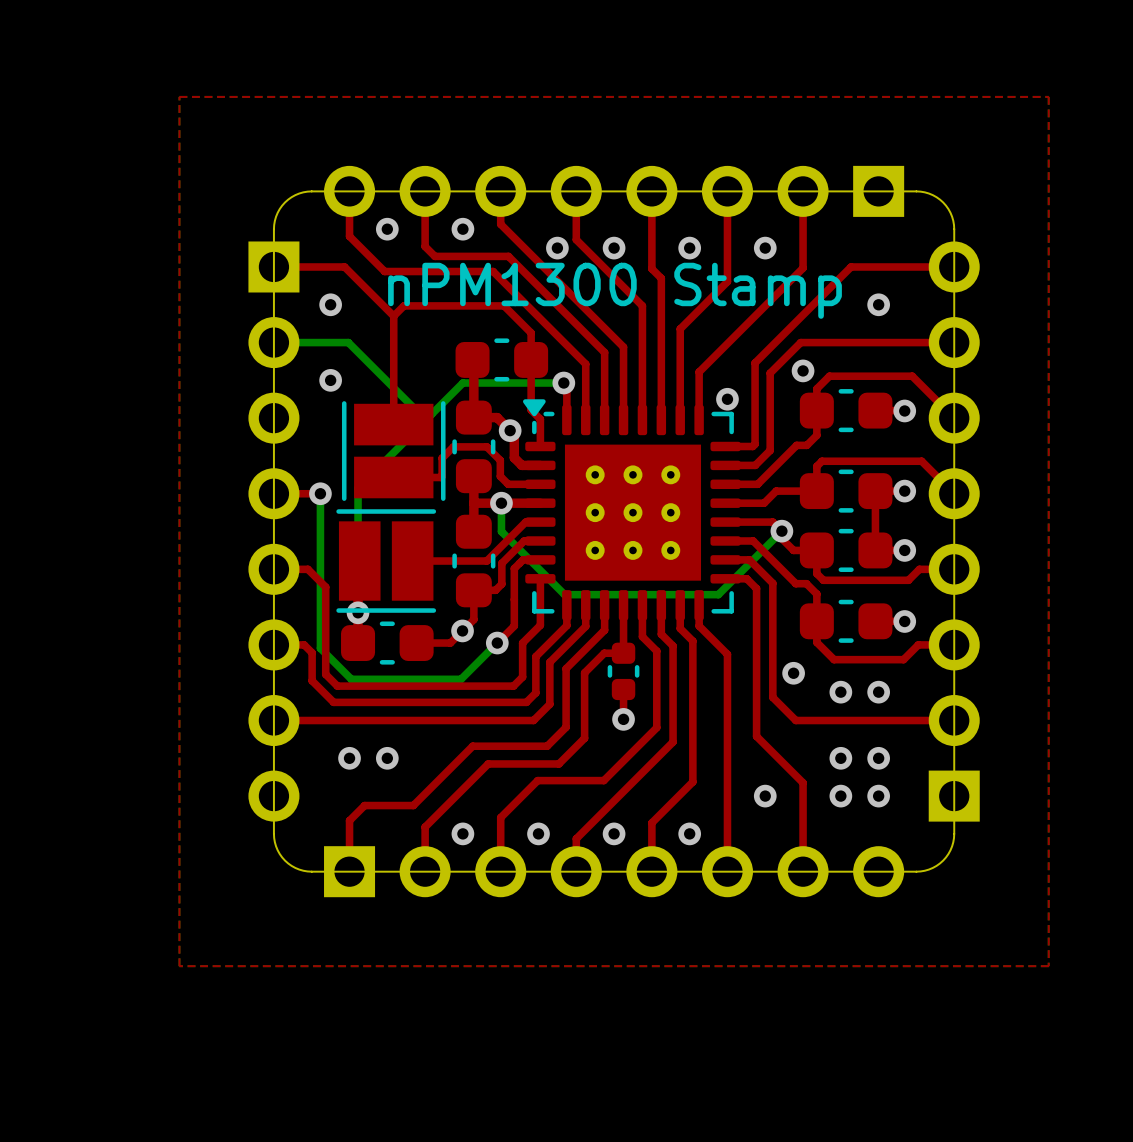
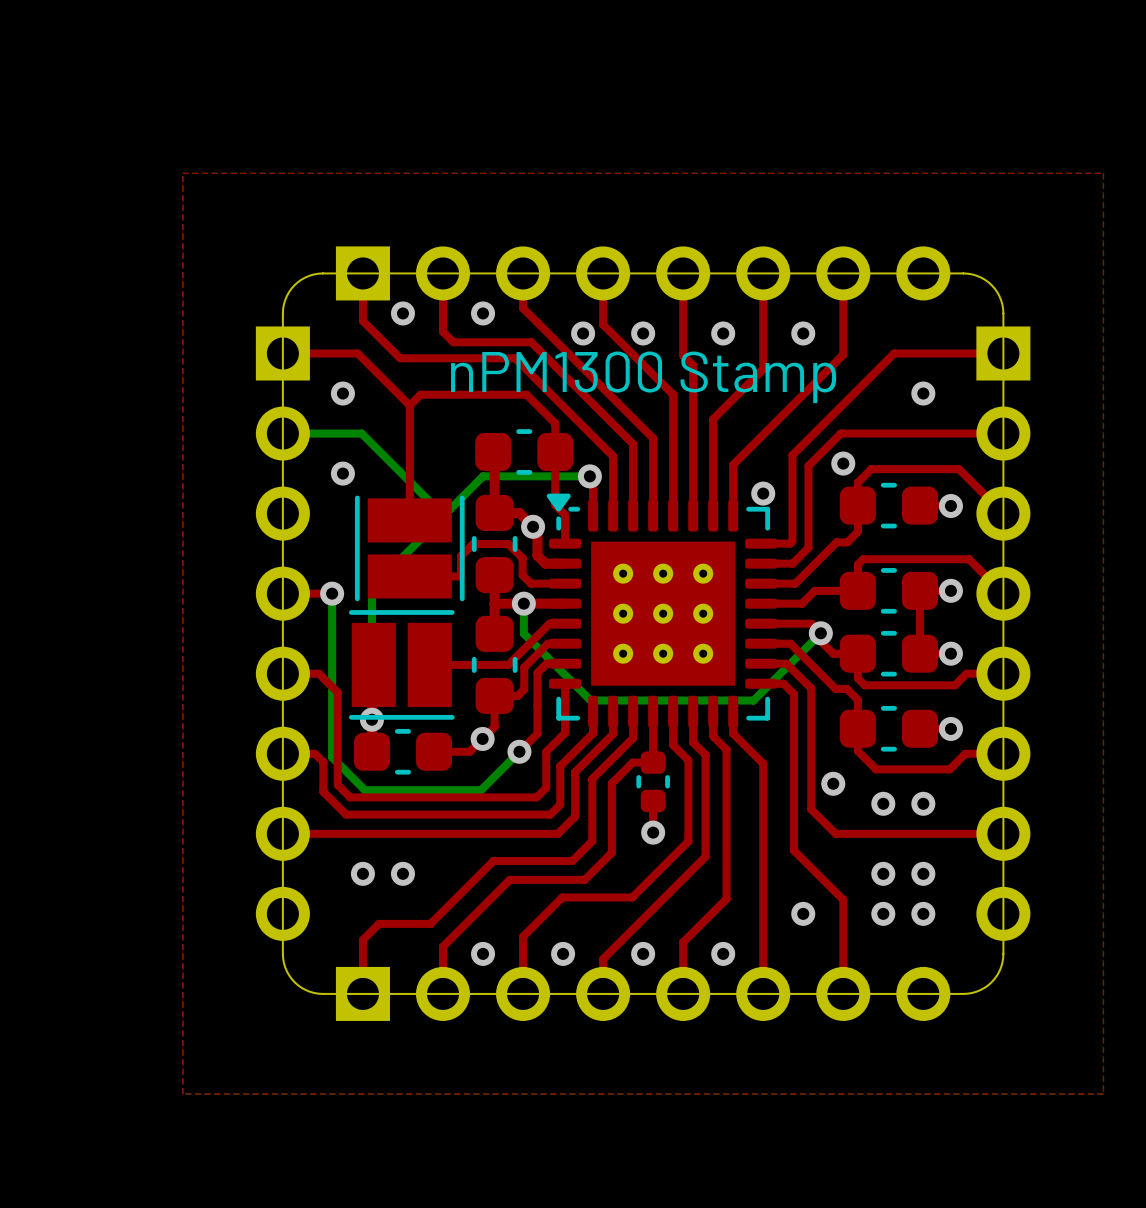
part rotation: 0° (614, 191) -> 180° (643, 273)
part rotation: 0° (954, 531) -> 180° (1003, 633)

